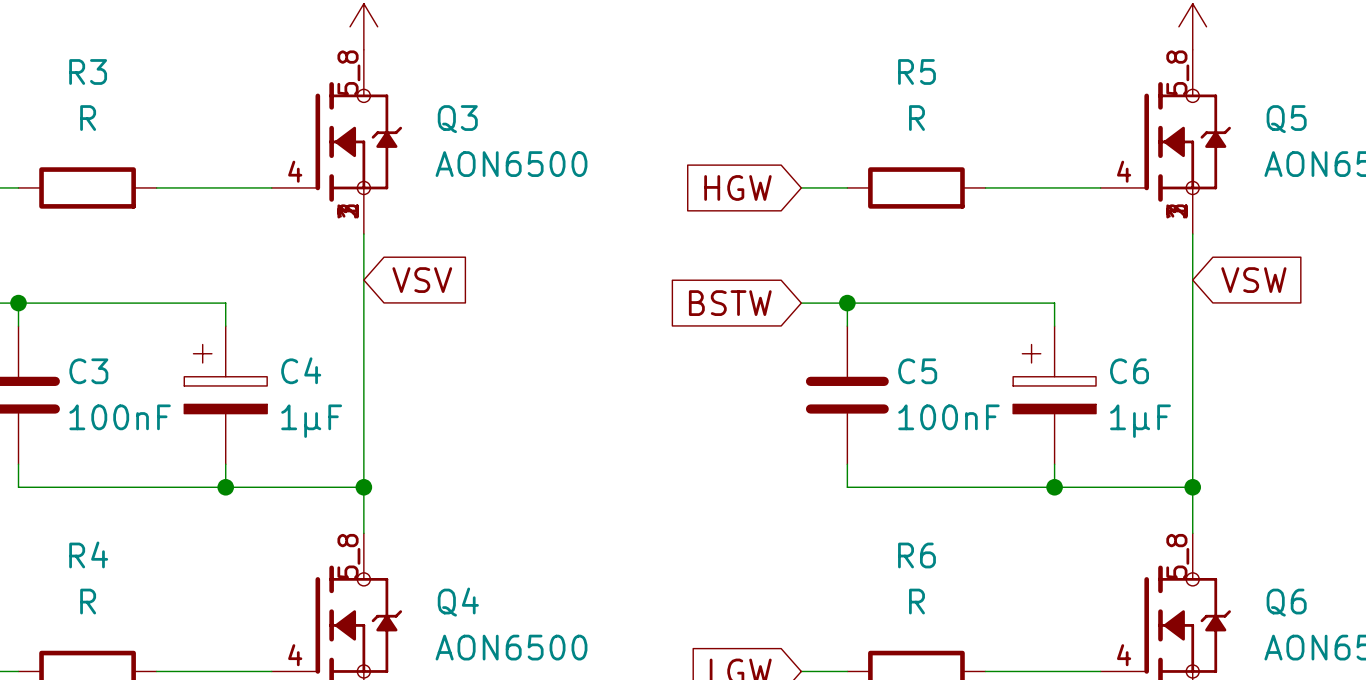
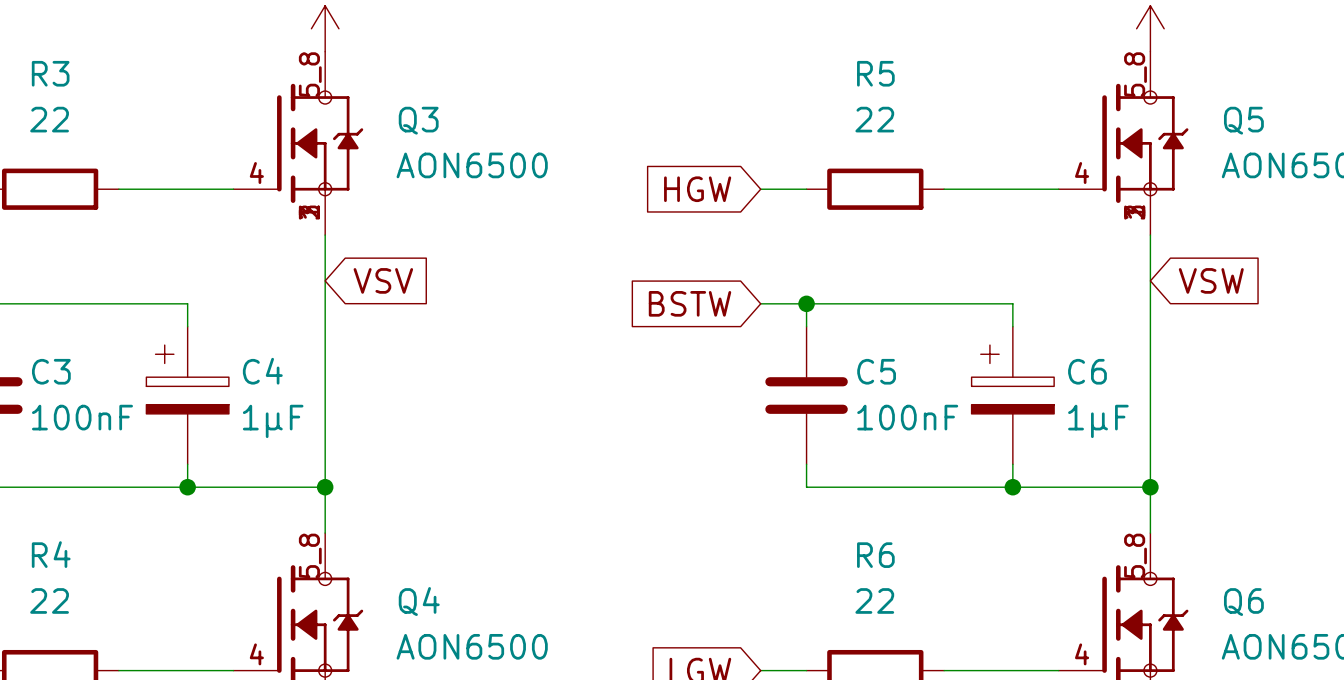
R3 value: R (88, 118) -> 22 (49, 119)
R5 value: R (916, 118) -> 22 (874, 119)
R4 value: R (88, 601) -> 22 (49, 600)
R6 value: R (916, 601) -> 22 (874, 600)

